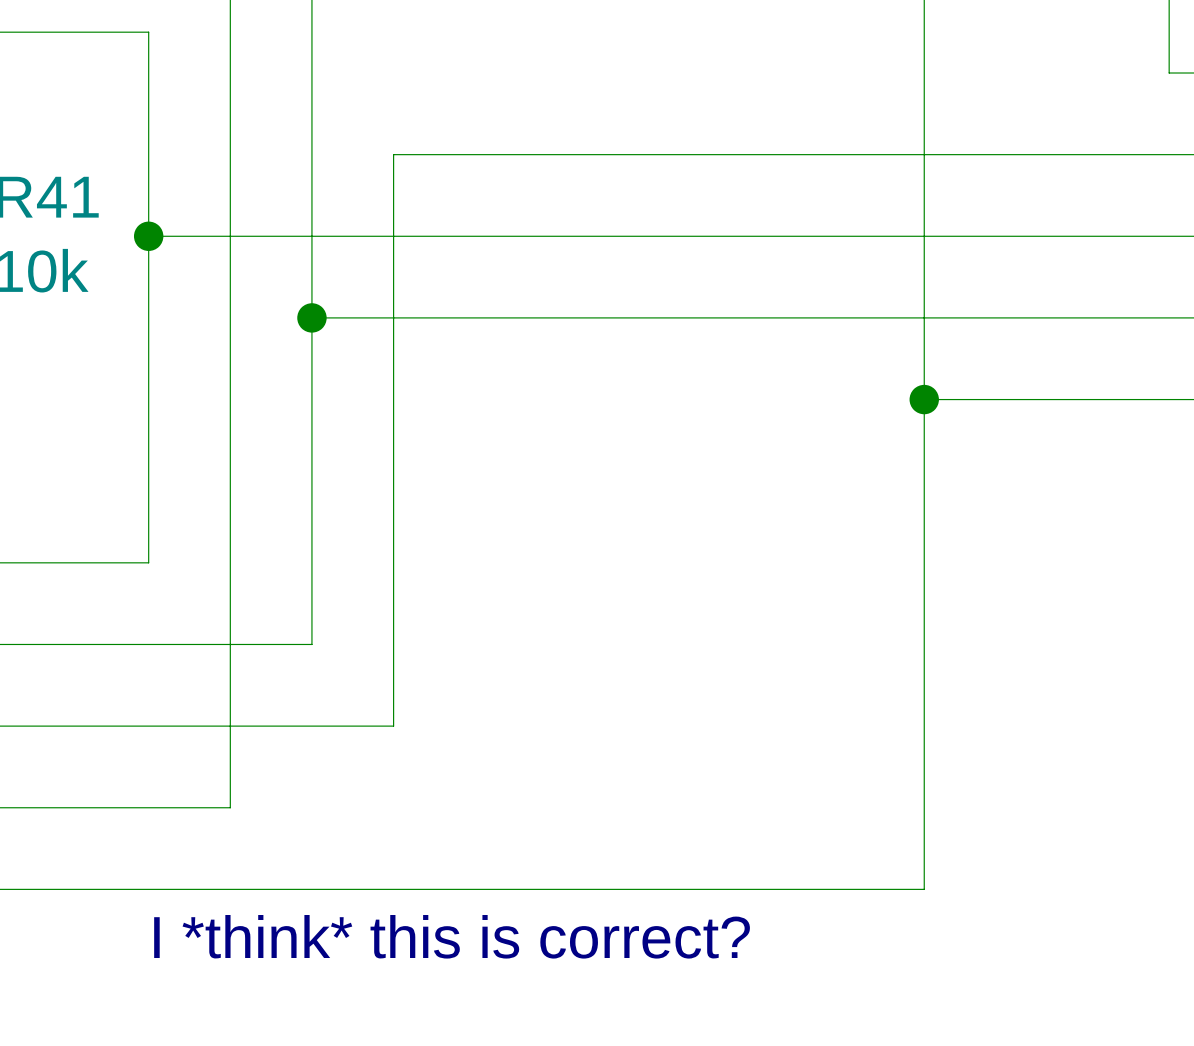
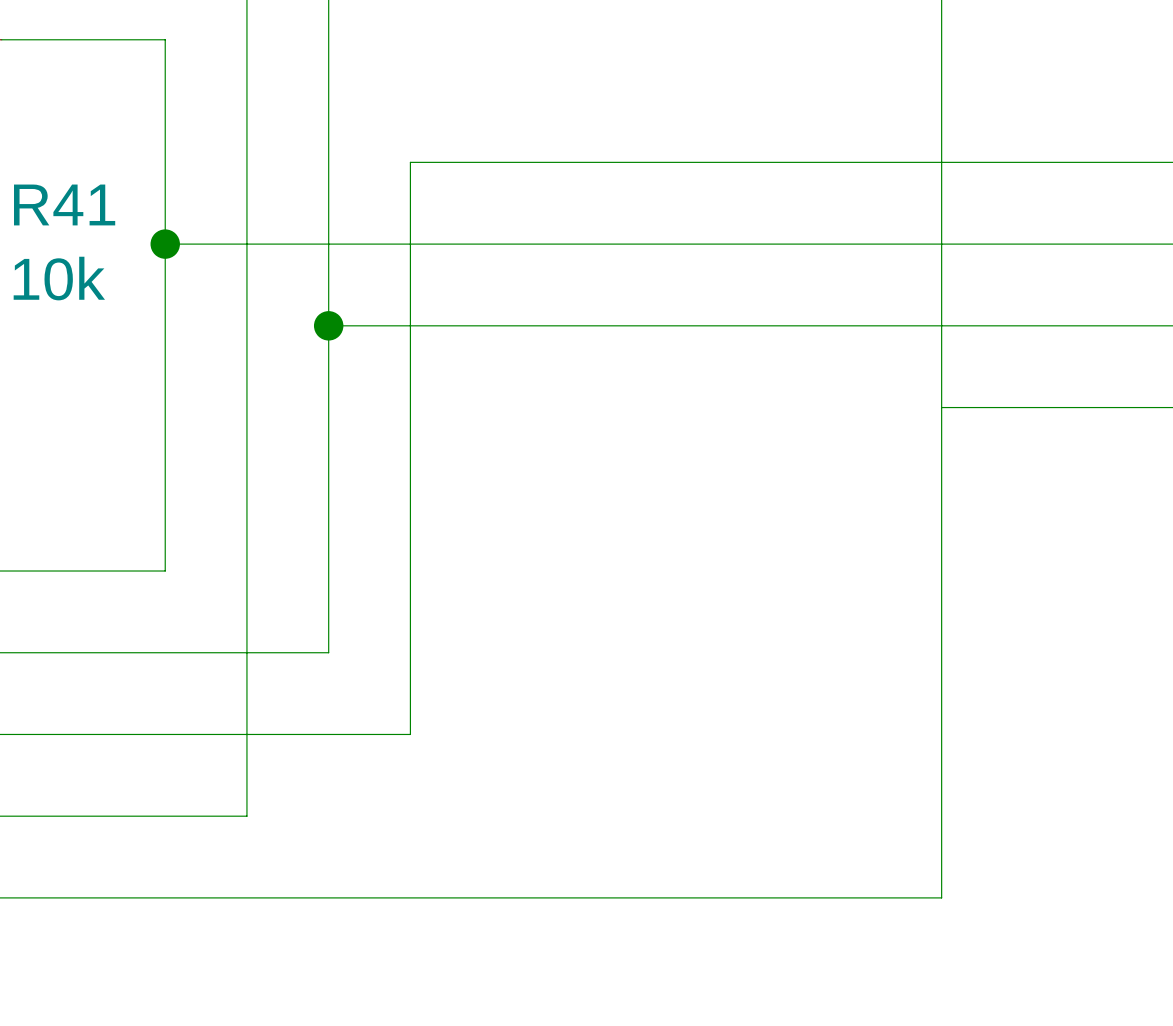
junction: (924, 399) -> none
text: I *think* this is correct? (452, 936) -> none

